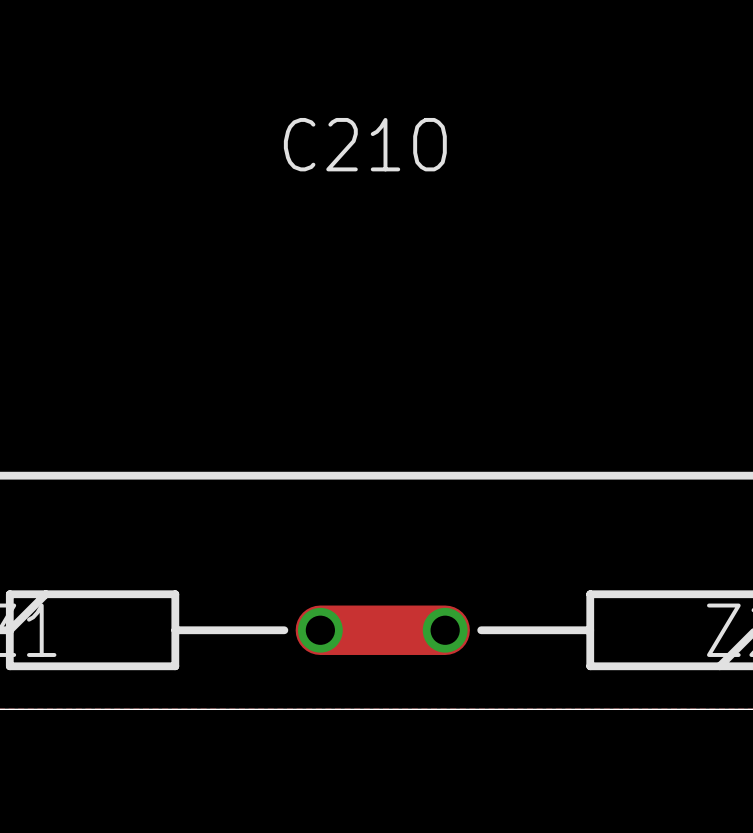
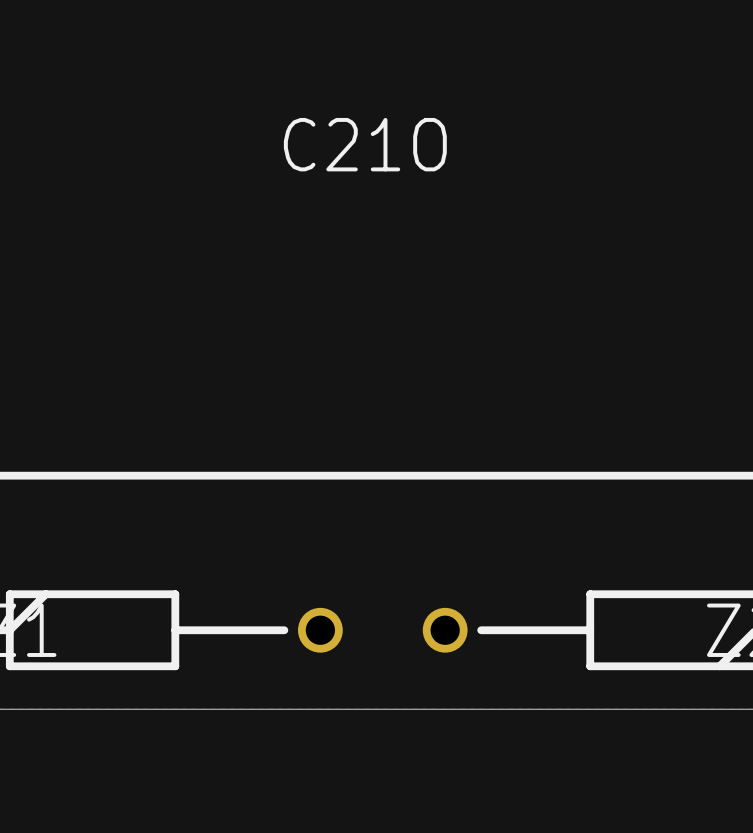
track: (320, 630) (445, 630) -> none

